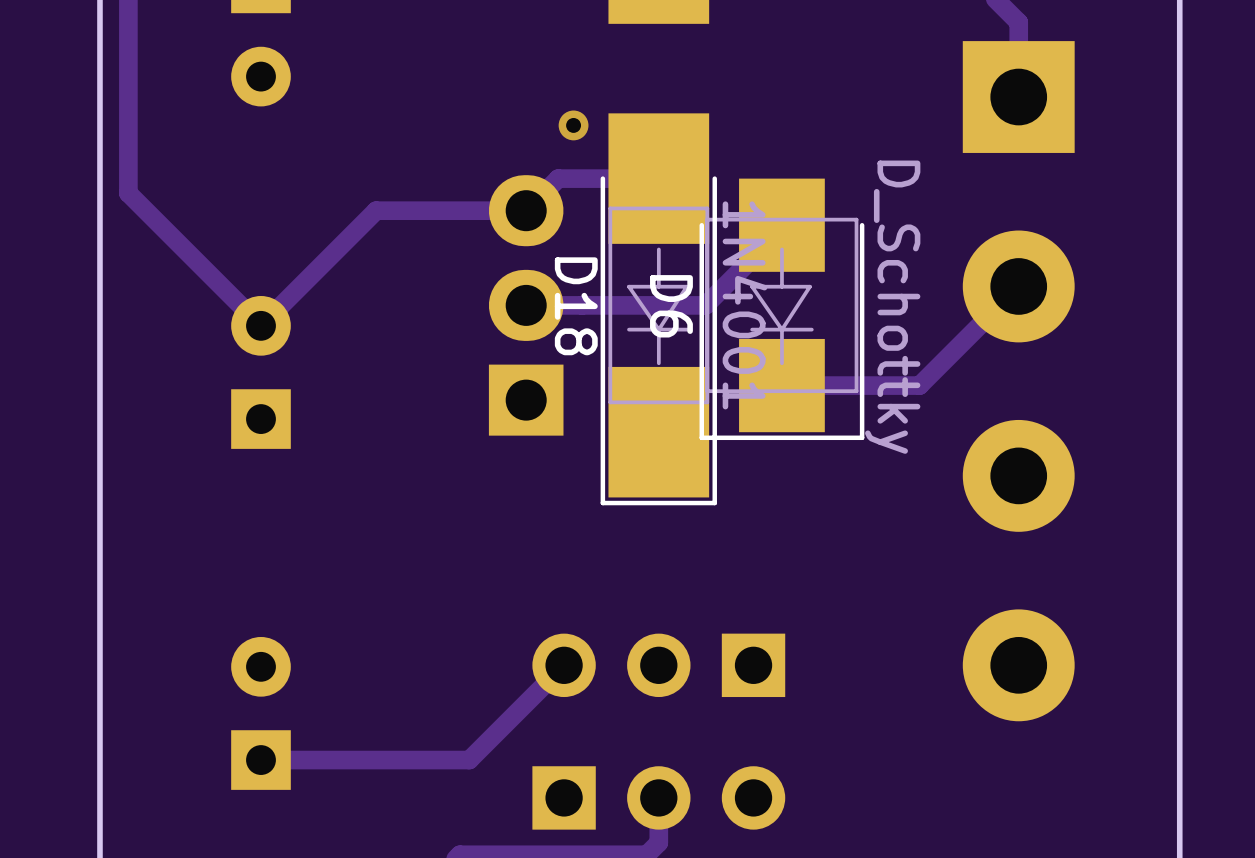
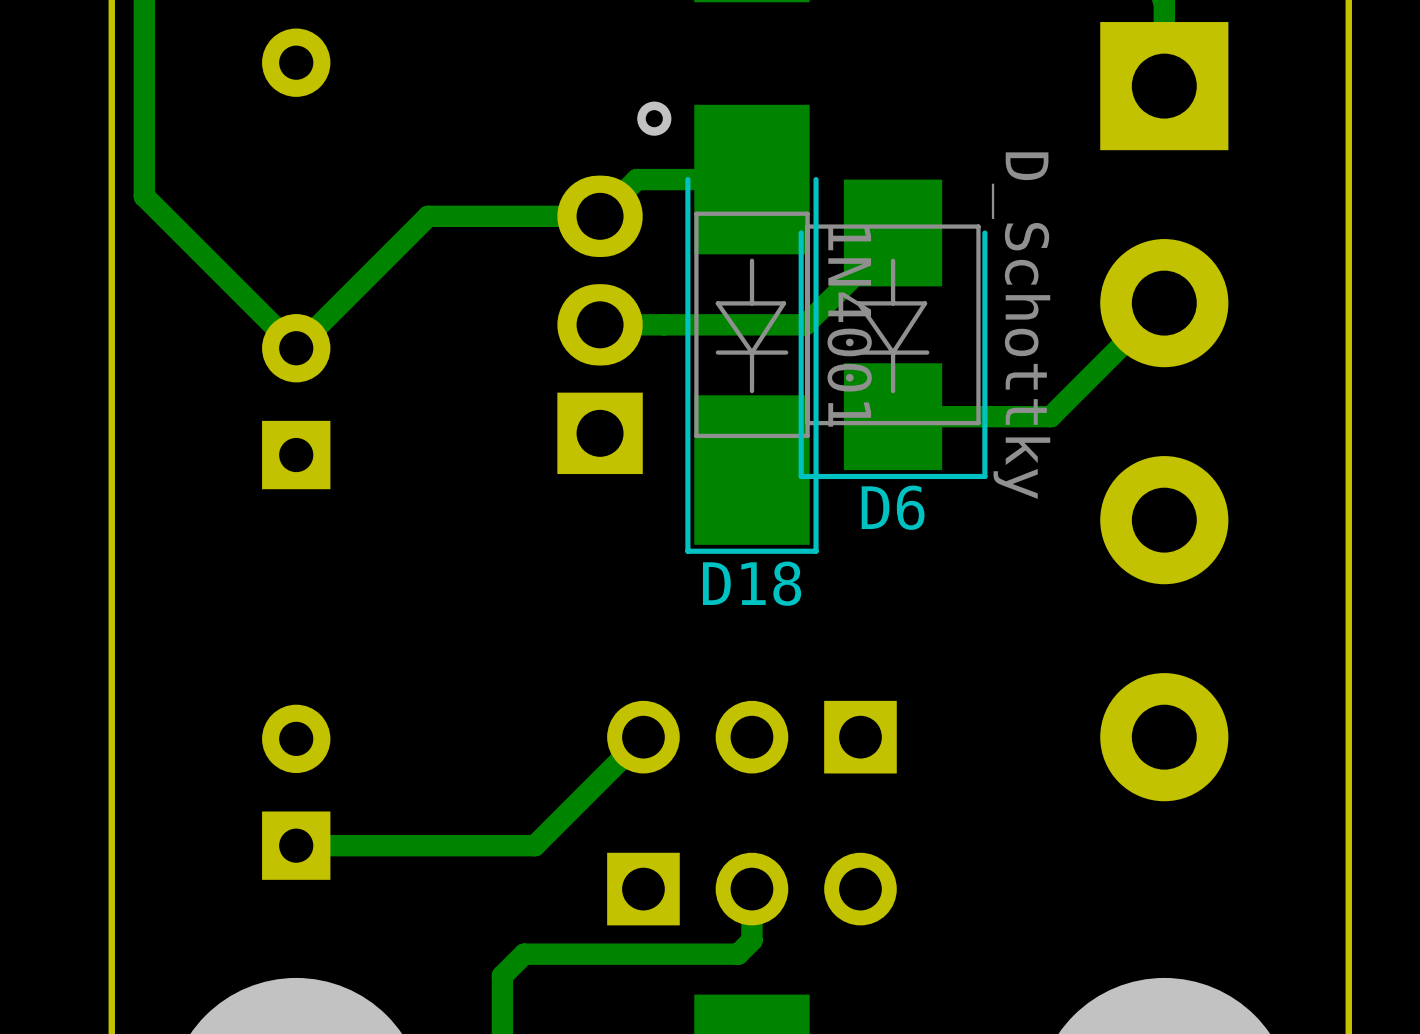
D18 name rotation: 0° (576, 306) -> 90° counterclockwise (752, 583)
D18 name position: D18 (576, 306) -> D18 (752, 583)
D6 name rotation: 0° (671, 306) -> 90° counterclockwise (893, 507)
D6 name position: D6 (671, 306) -> D6 (893, 507)

